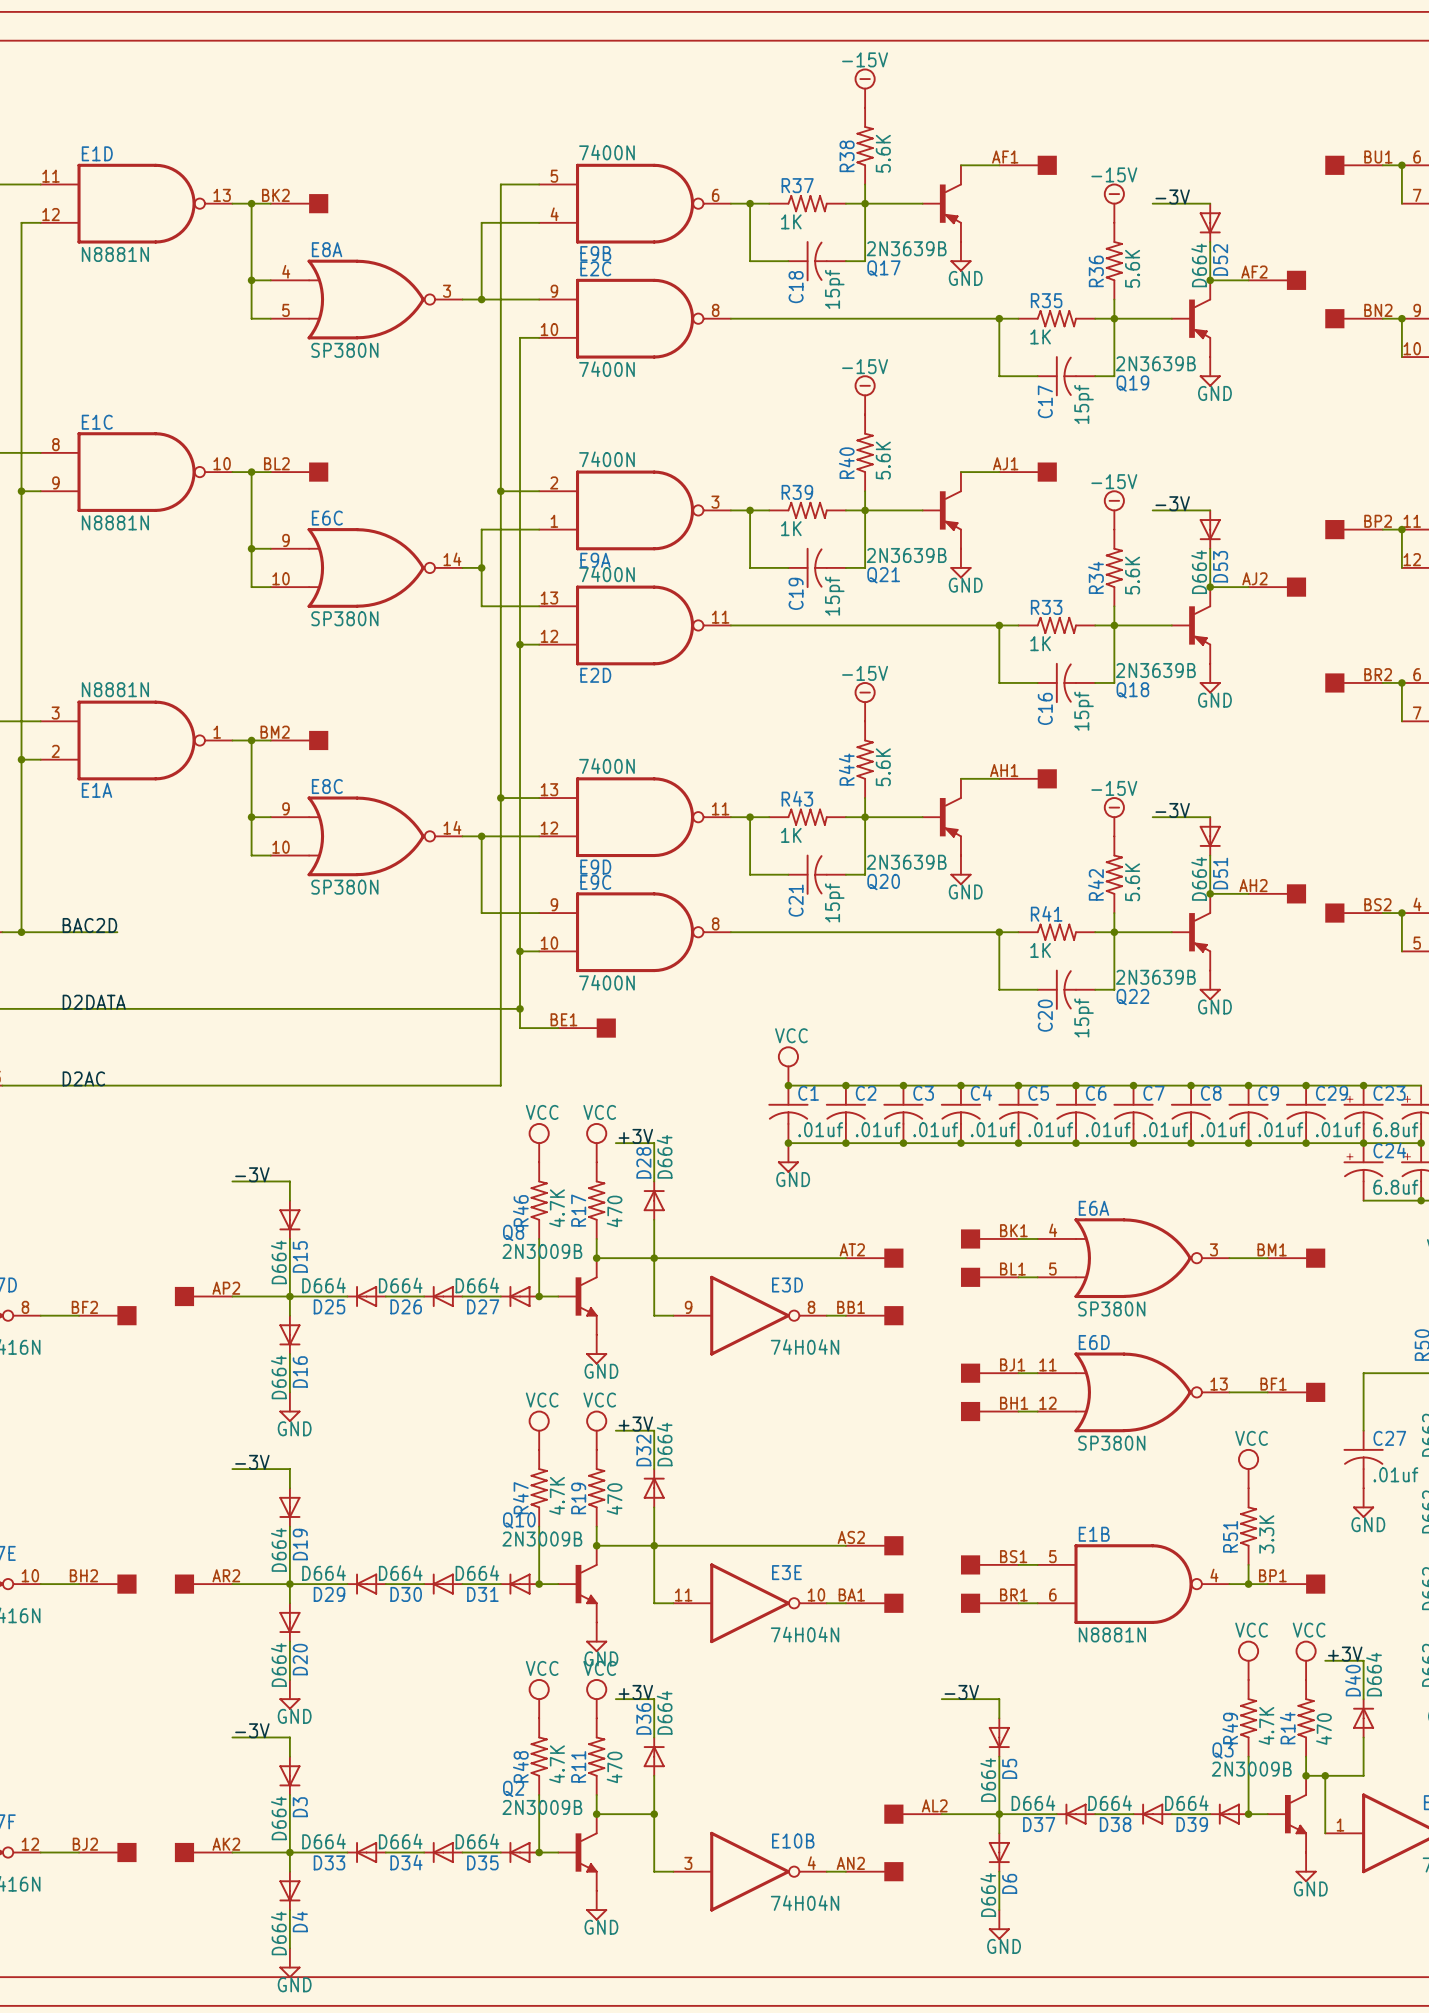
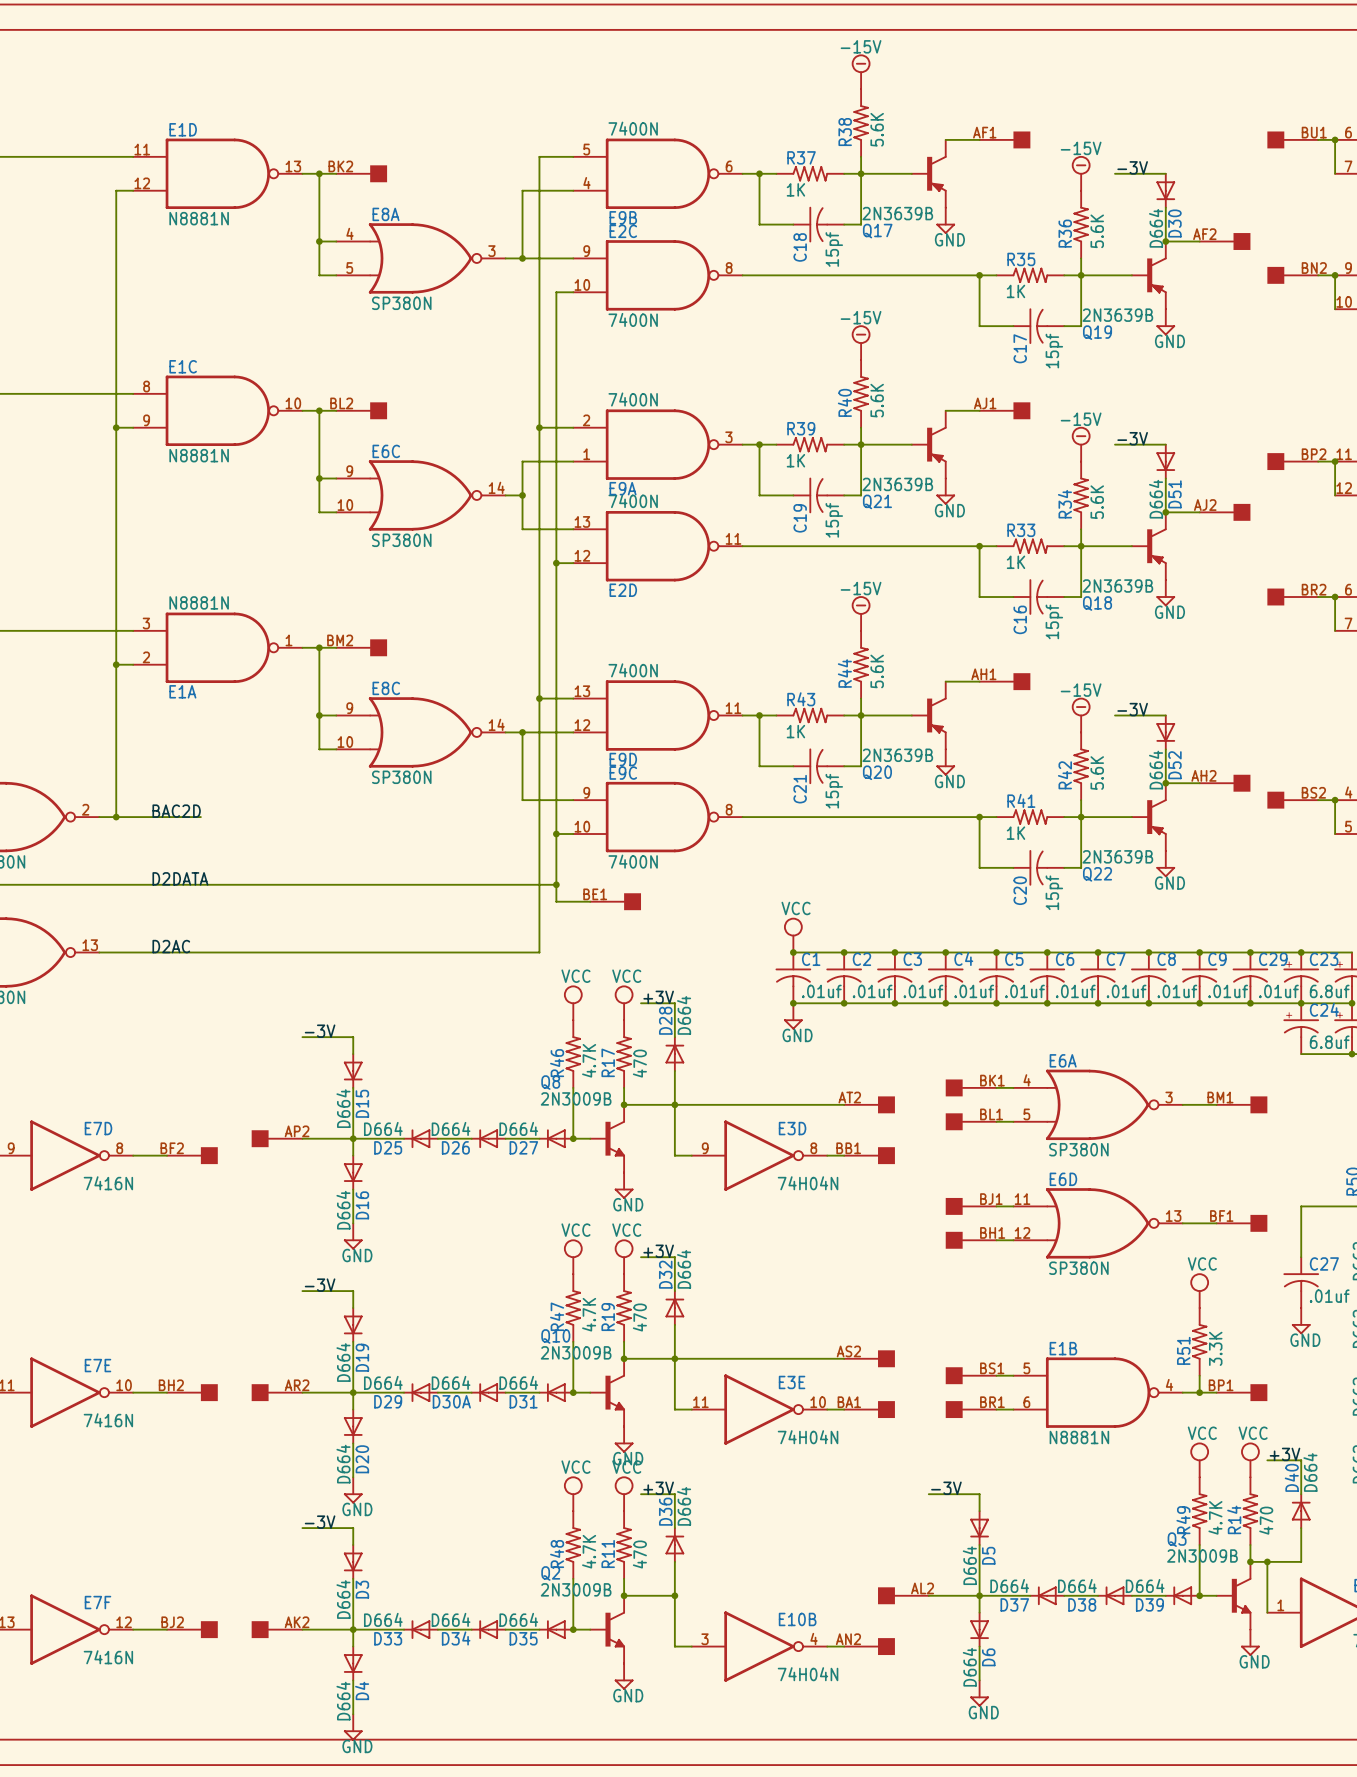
D52 name: D52 (1220, 259) -> D30 (1174, 223)
D53 name: D53 (1220, 566) -> D51 (1174, 494)
D51 name: D51 (1220, 873) -> D52 (1174, 765)
D30 name: D30 (406, 1594) -> D30A (451, 1401)

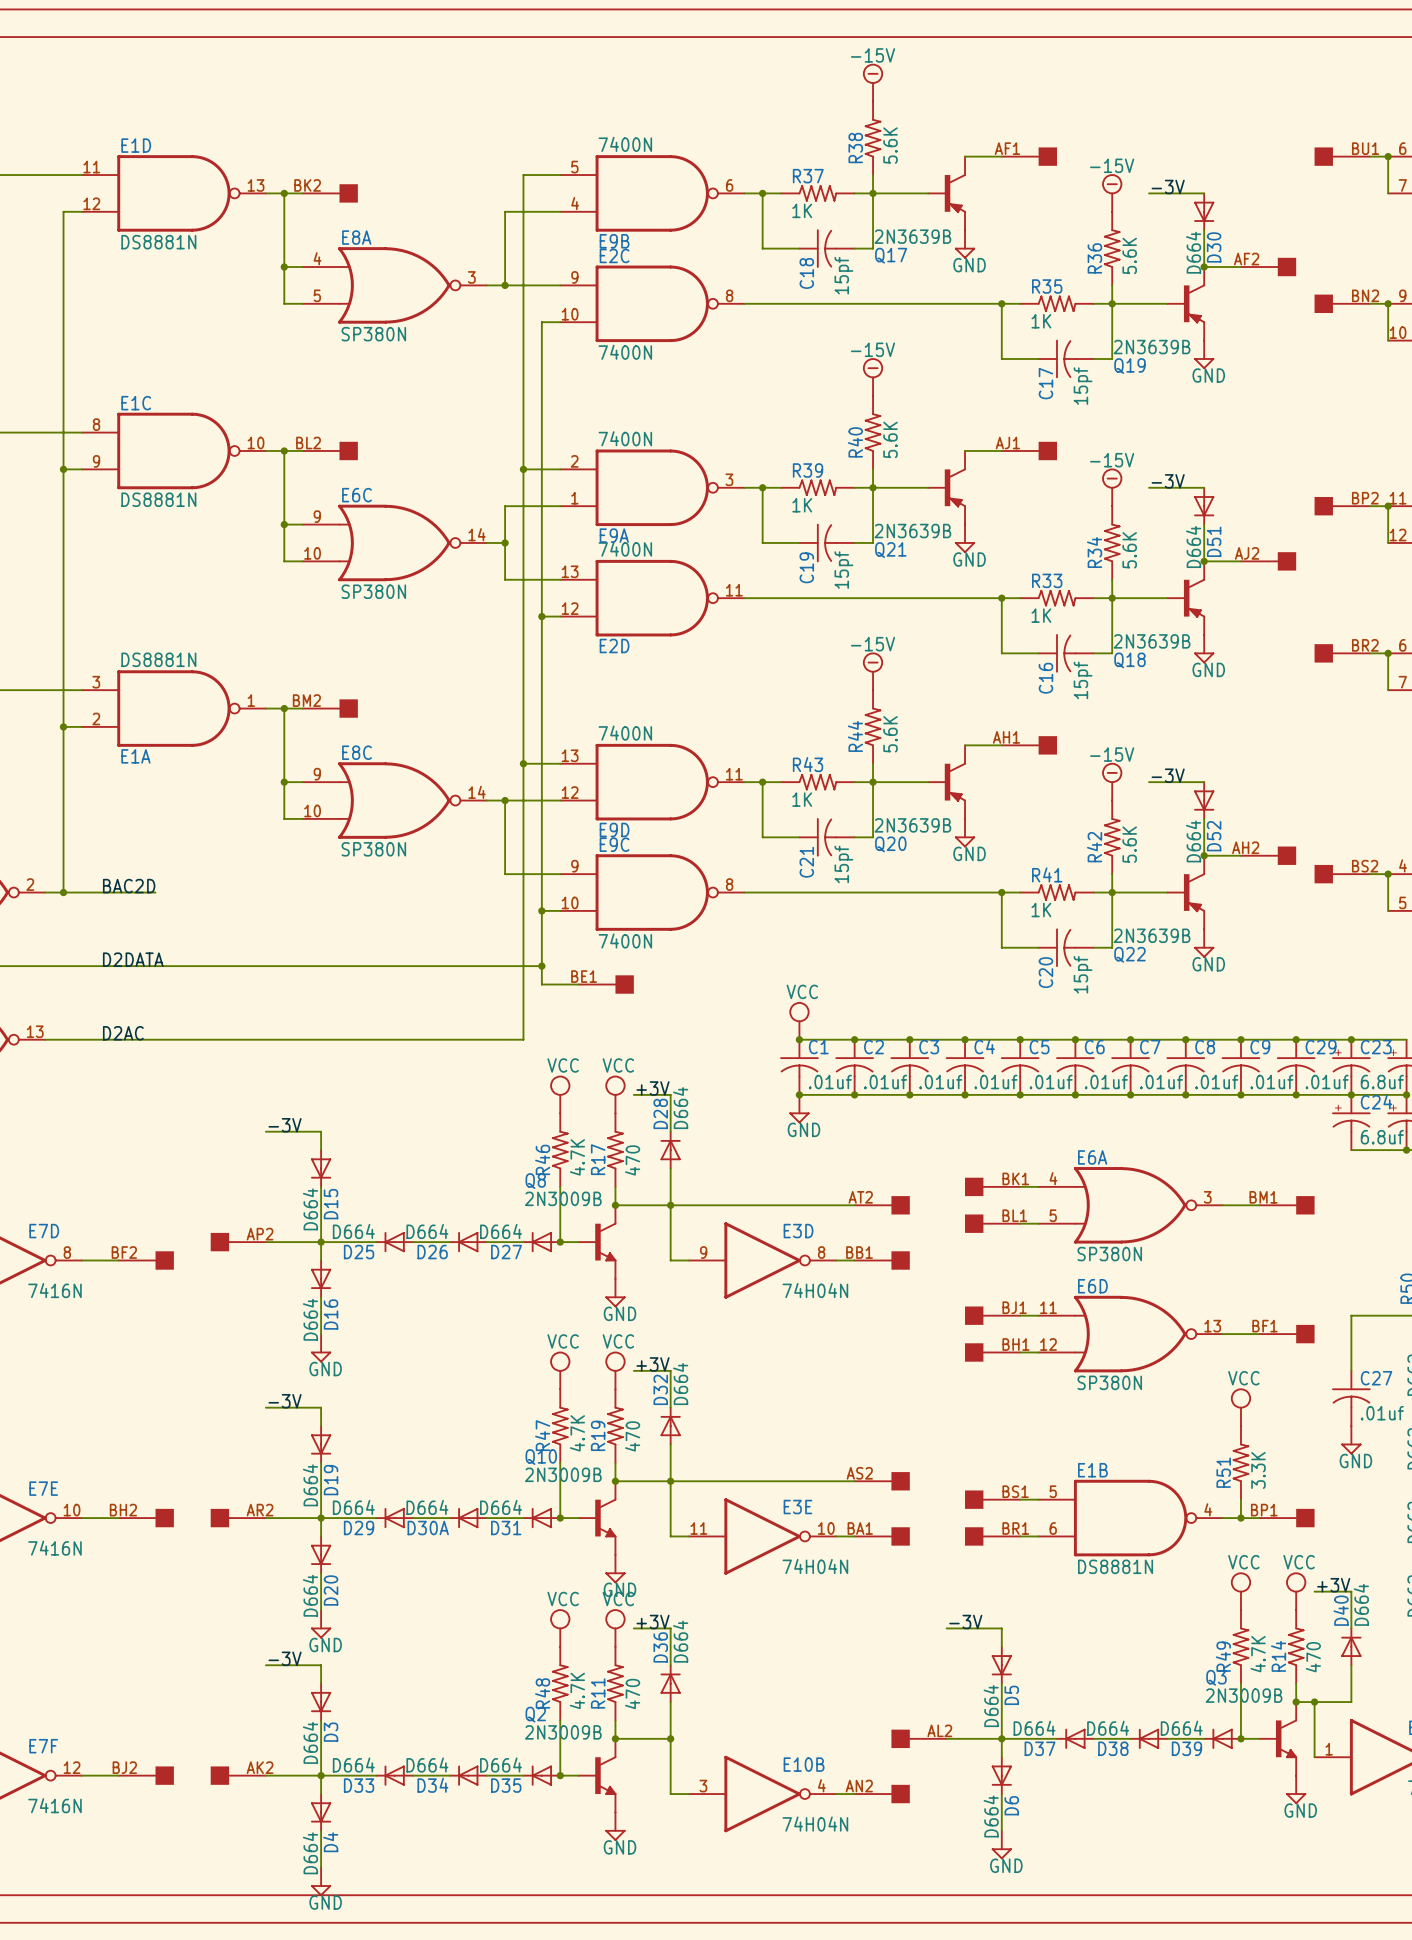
E1D value: N8881N (199, 218) -> DS8881N (158, 242)
E1C value: N8881N (199, 455) -> DS8881N (158, 499)
E1A value: N8881N (199, 602) -> DS8881N (158, 659)
E1B value: N8881N (1079, 1437) -> DS8881N (1115, 1566)

